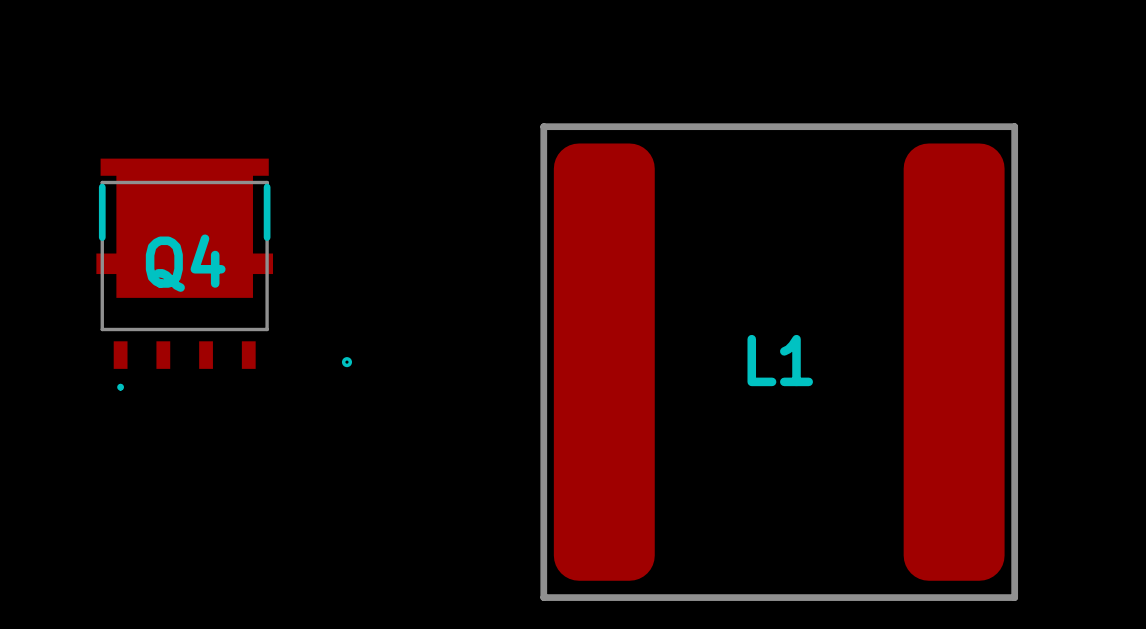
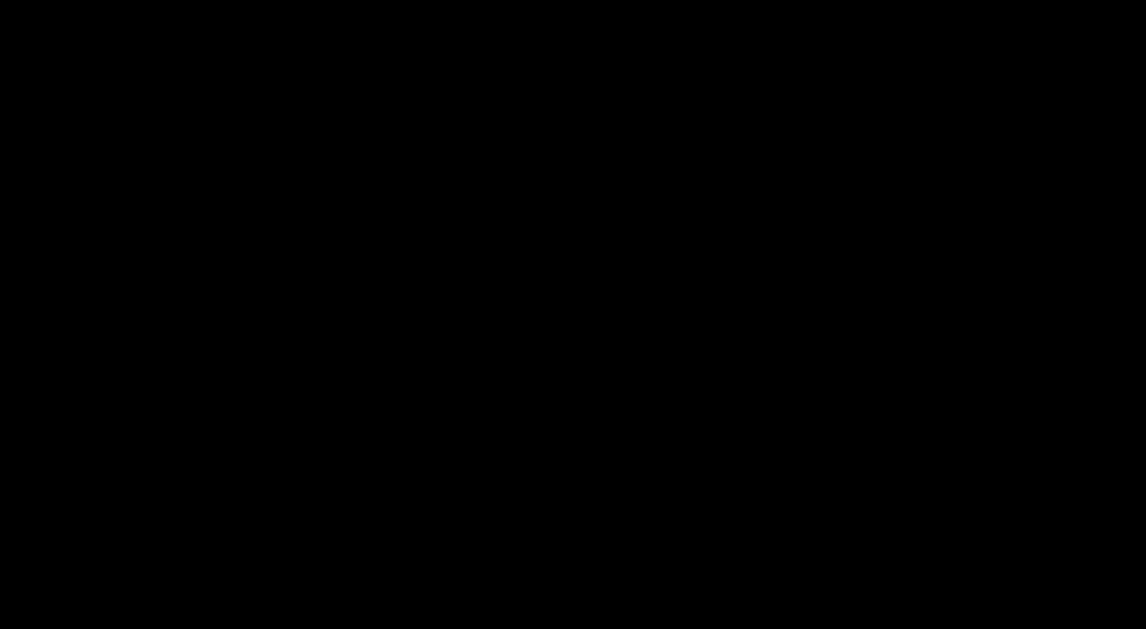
Q4: (184, 274) -> none
L1: (679, 362) -> none

